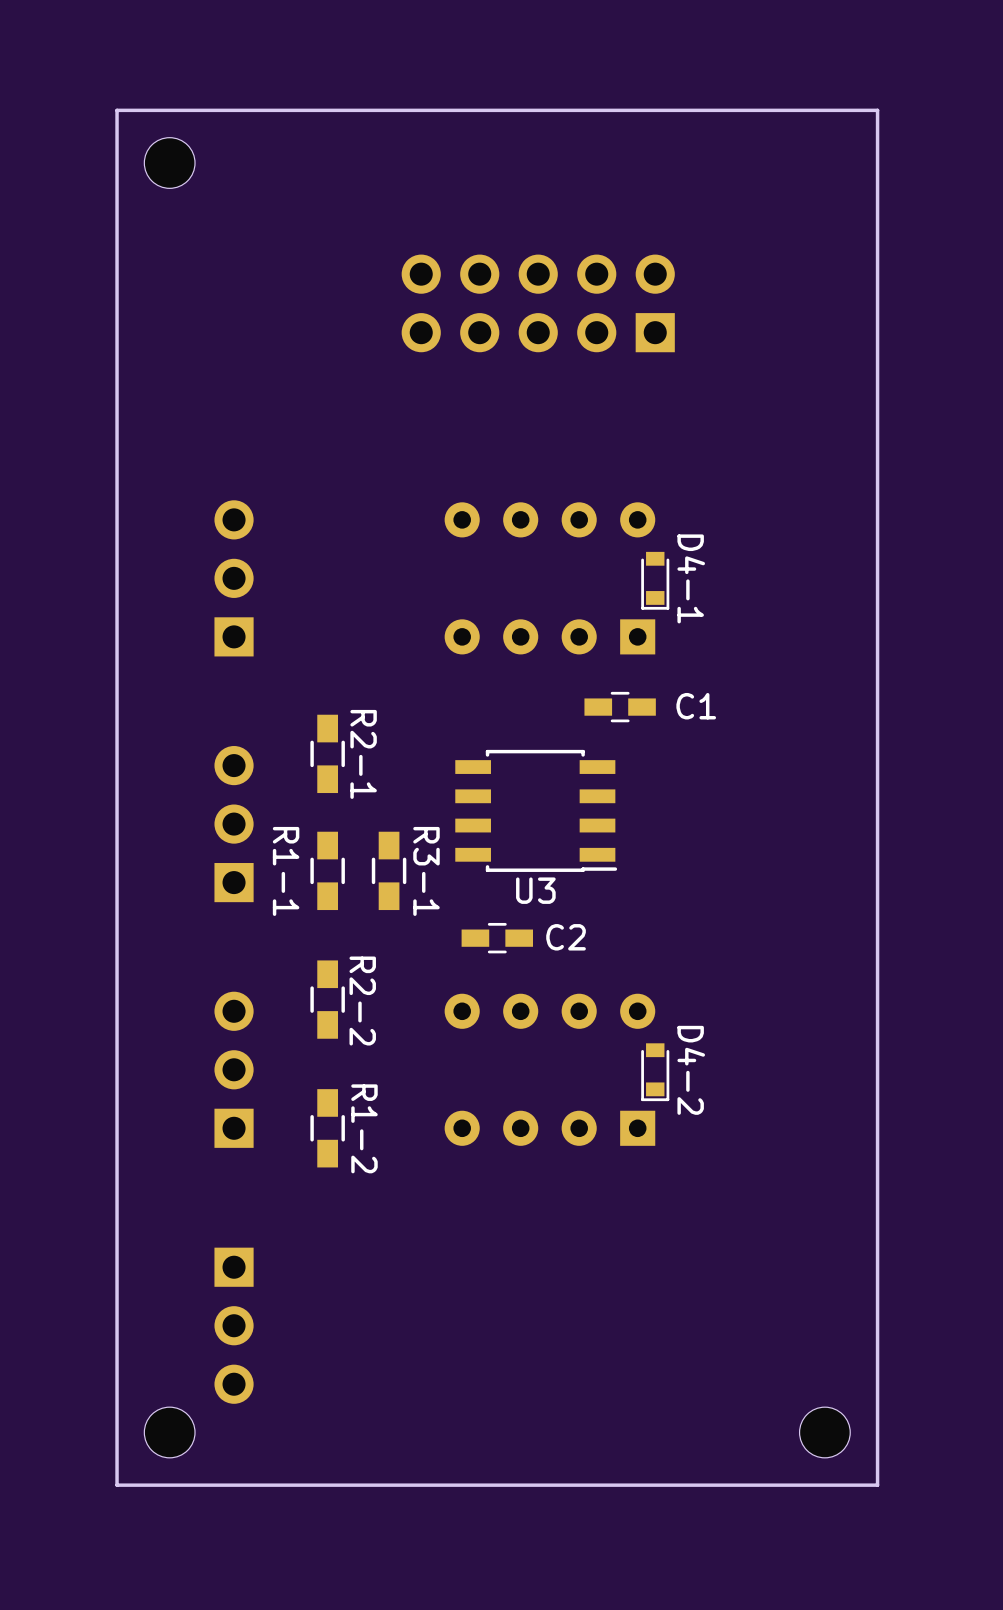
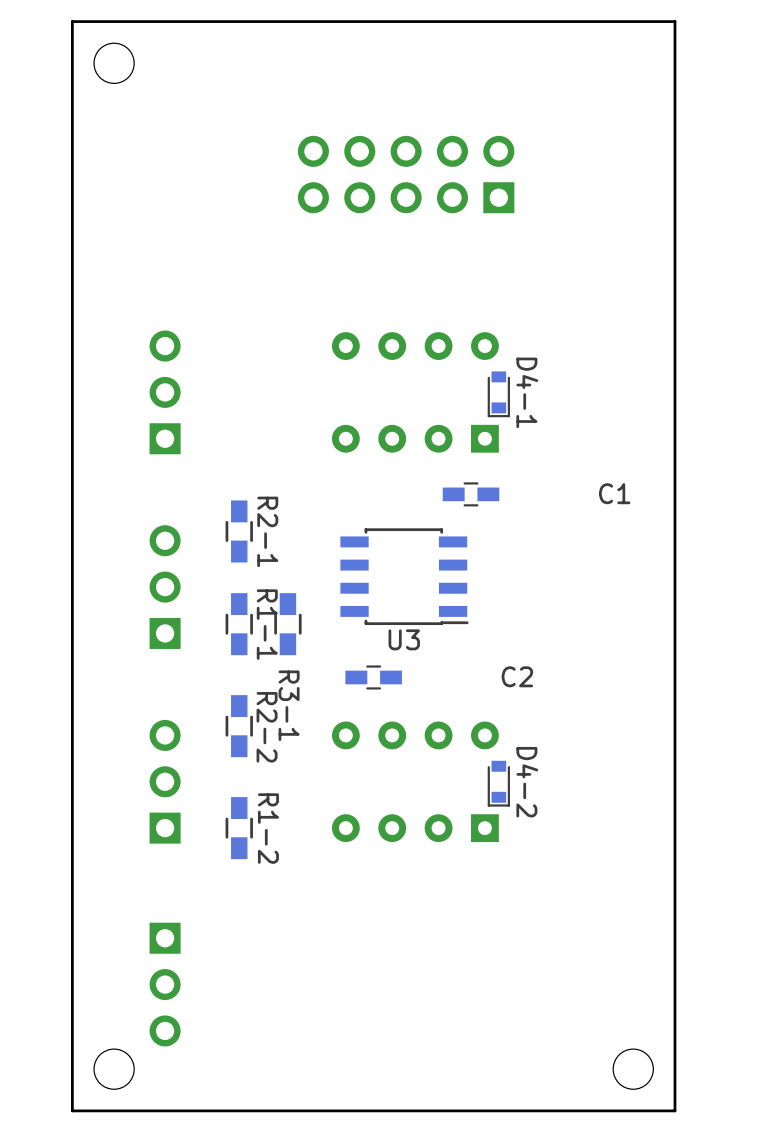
C1 name position: C1 (696, 706) -> C1 (614, 493)
R1-1 name position: R1-1 (286, 871) -> R1-1 (267, 624)
R3-1 name position: R3-1 (426, 871) -> R3-1 (289, 705)
C2 name position: C2 (566, 937) -> C2 (517, 676)

